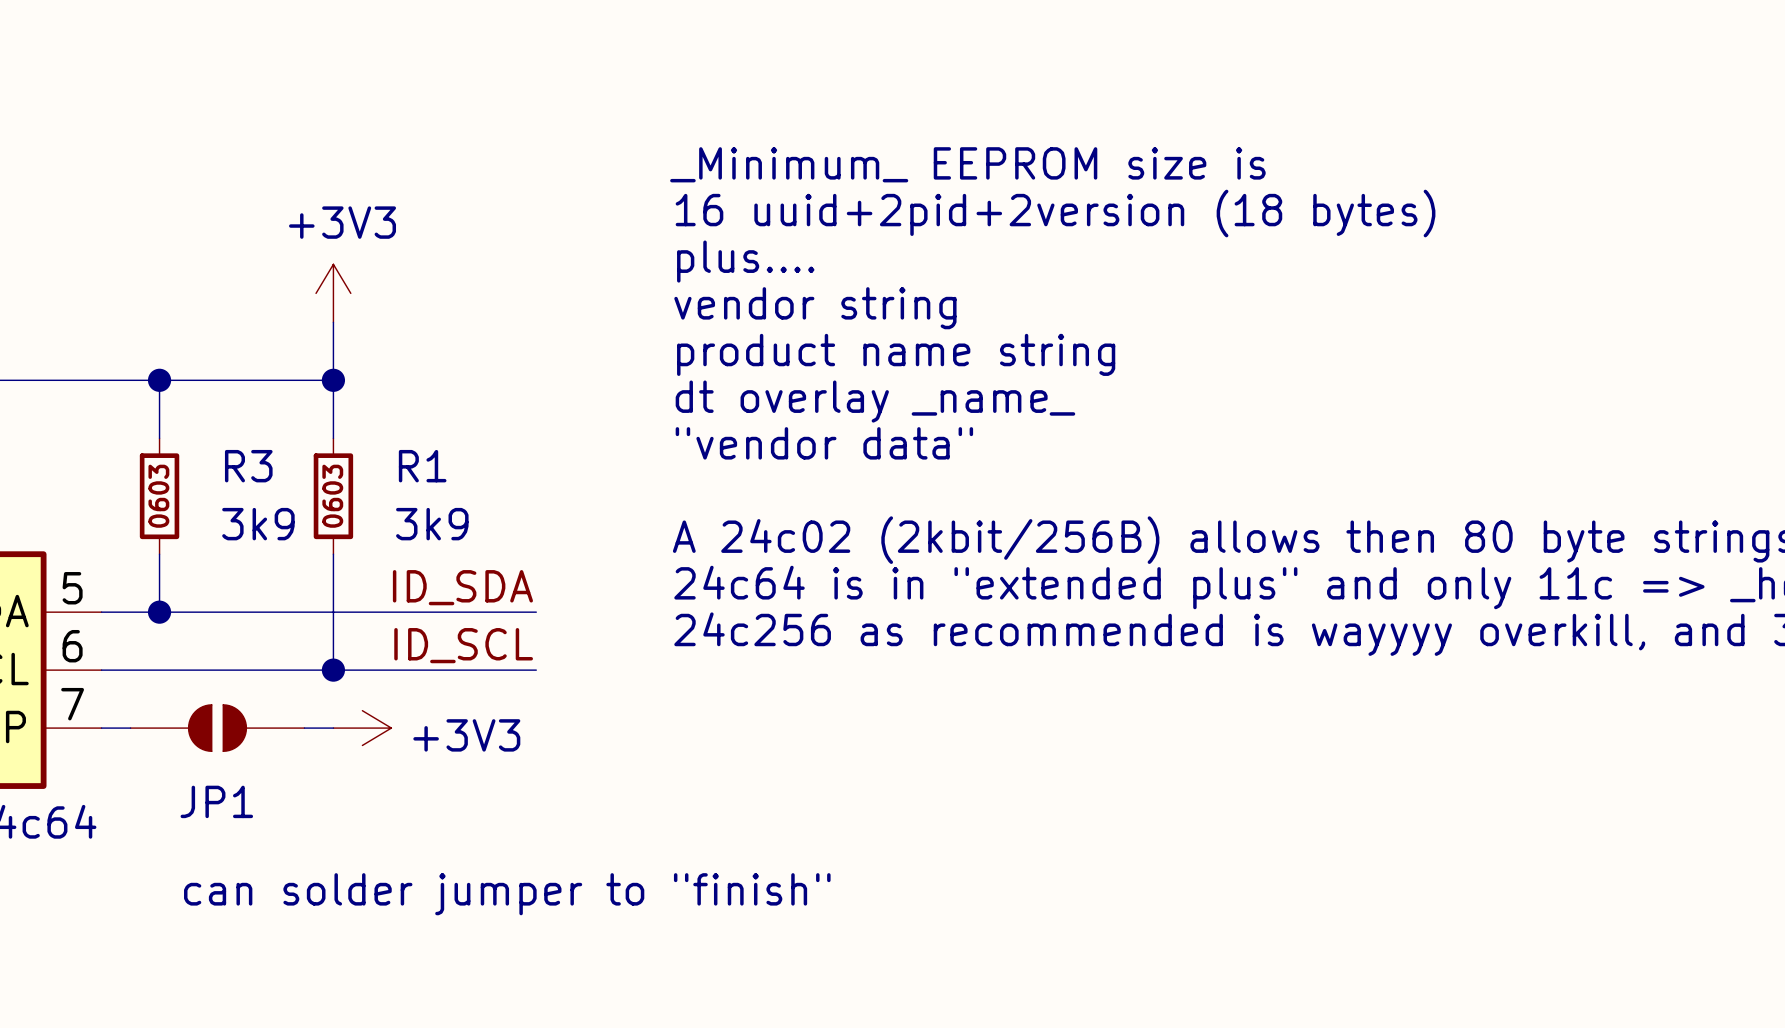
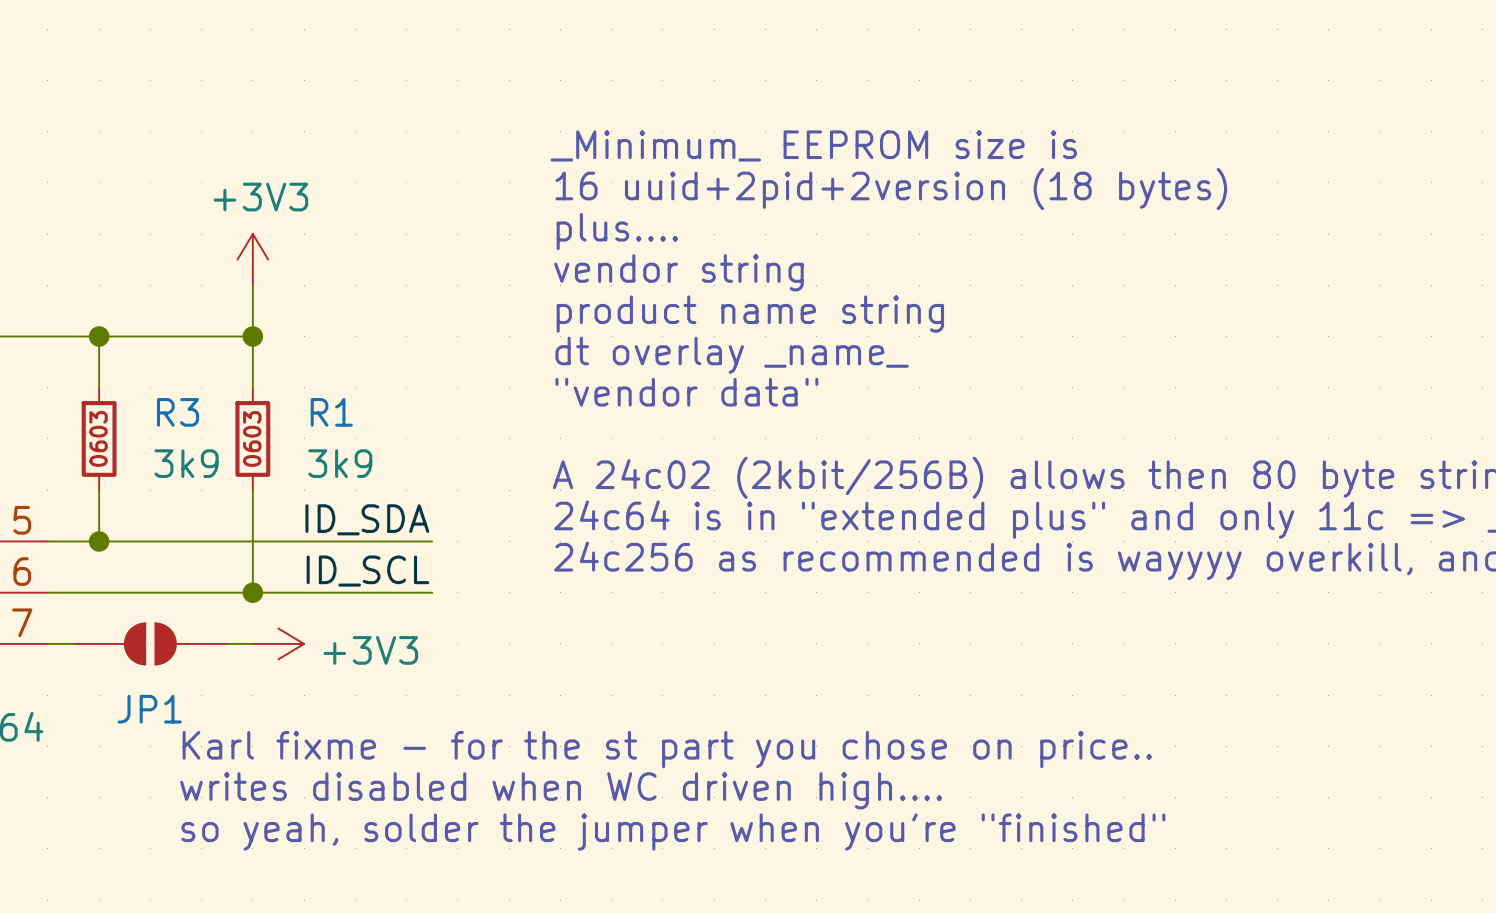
text: none -> Karl fixme - for the st part you chose on price.. (667, 749)
text: can solder jumper to "finish" (507, 894) -> so yeah, solder the jumper when you're "finished" (673, 832)
text: none -> writes disabled when WC driven high.... (561, 790)

